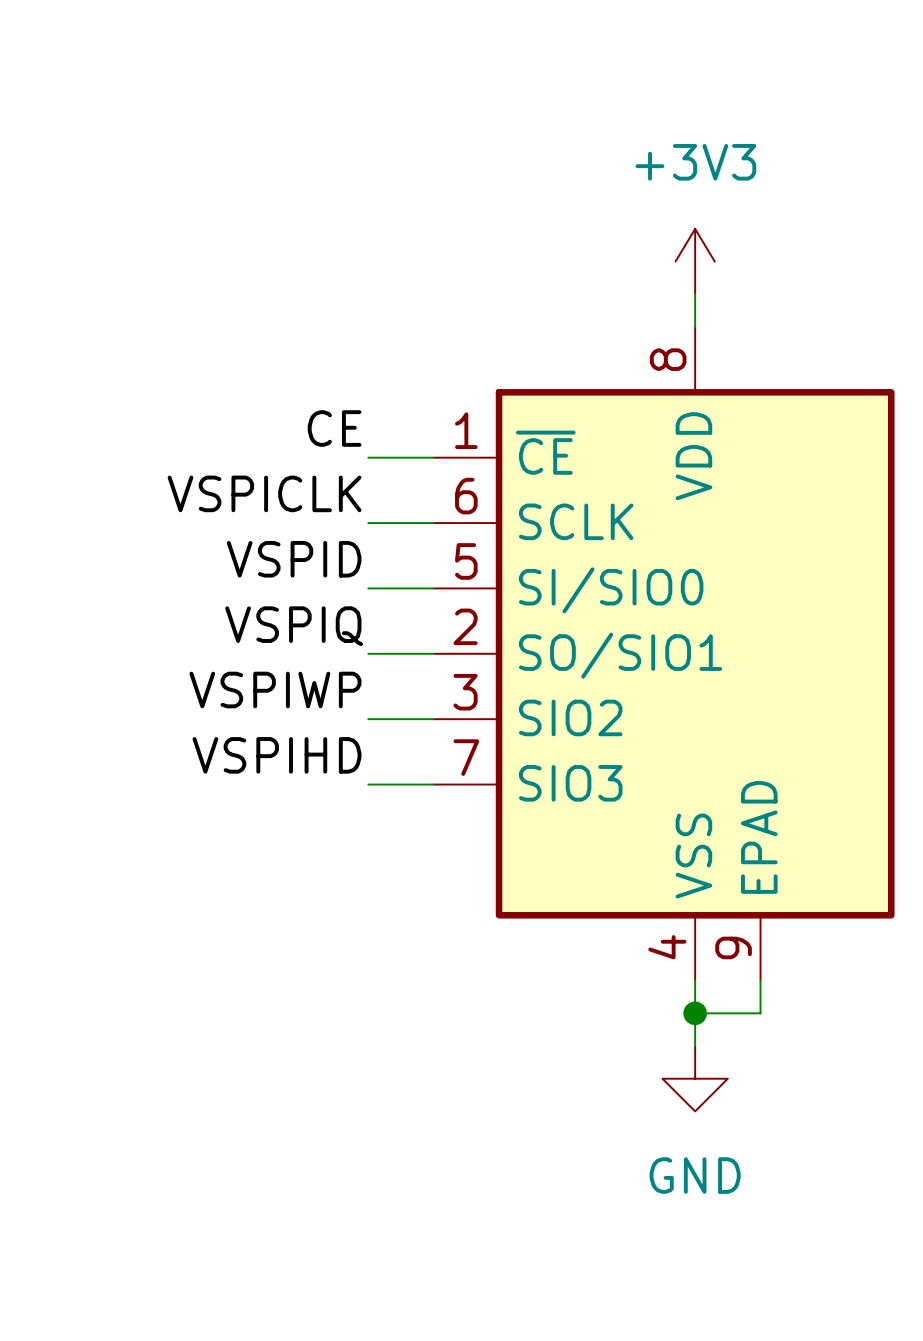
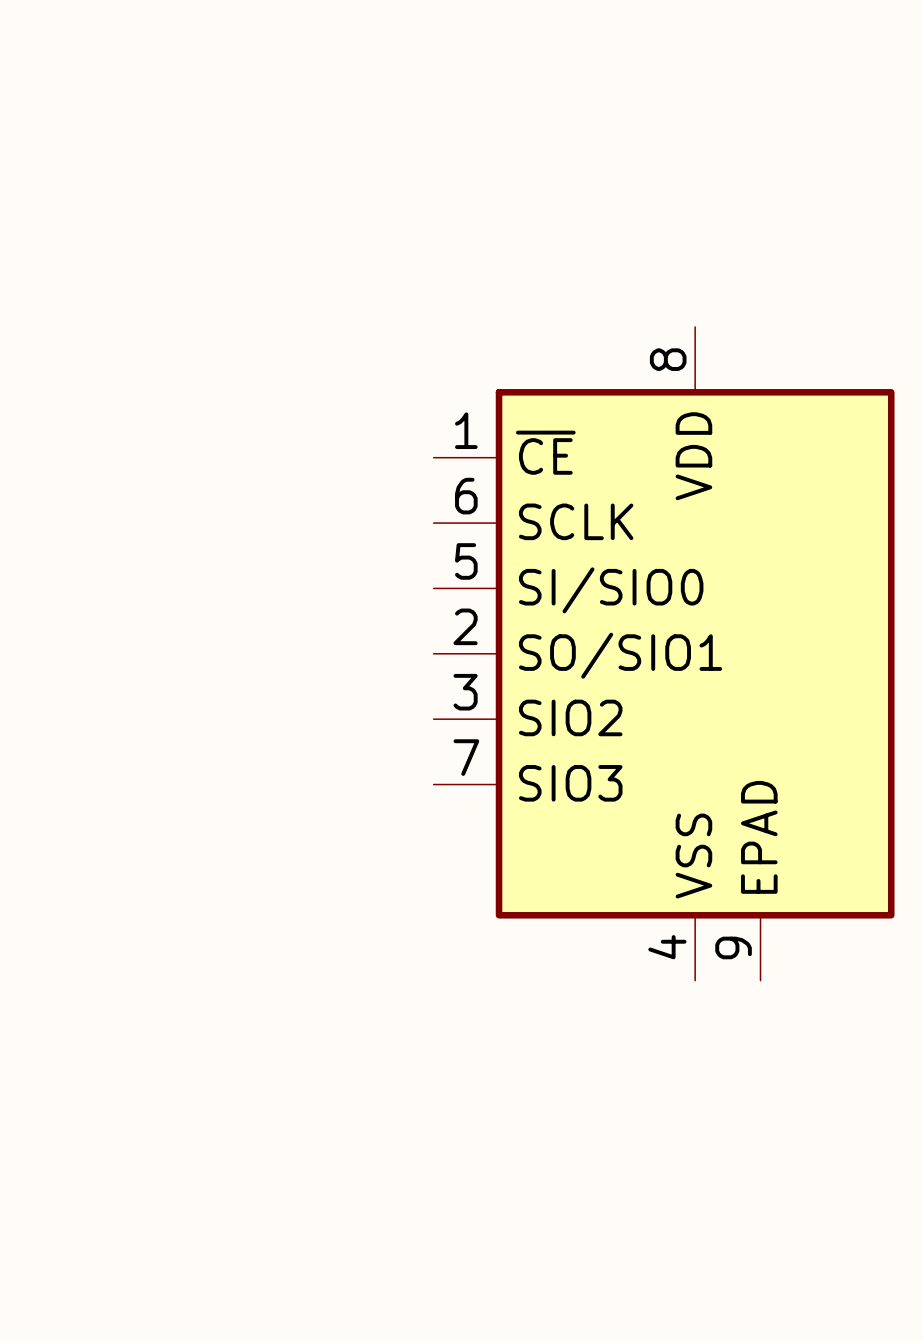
power symbol: +3V3 (695, 261) -> none
wire: (695, 294) (695, 326) -> none
label: CE (334, 428) -> none
wire: (368, 457) (433, 457) -> none
label: VSPICLK (264, 493) -> none
wire: (368, 523) (433, 523) -> none
label: VSPID (294, 559) -> none
wire: (368, 588) (433, 588) -> none
label: VSPIQ (294, 626) -> none
wire: (368, 653) (433, 653) -> none
label: VSPIWP (275, 690) -> none
wire: (368, 719) (433, 719) -> none
label: VSPIHD (276, 755) -> none
wire: (368, 784) (433, 784) -> none
wire: (695, 980) (695, 1046) -> none
wire: (760, 980) (760, 1013) (695, 1013) -> none
junction: (695, 1013) -> none
power symbol: GND (695, 1078) -> none

